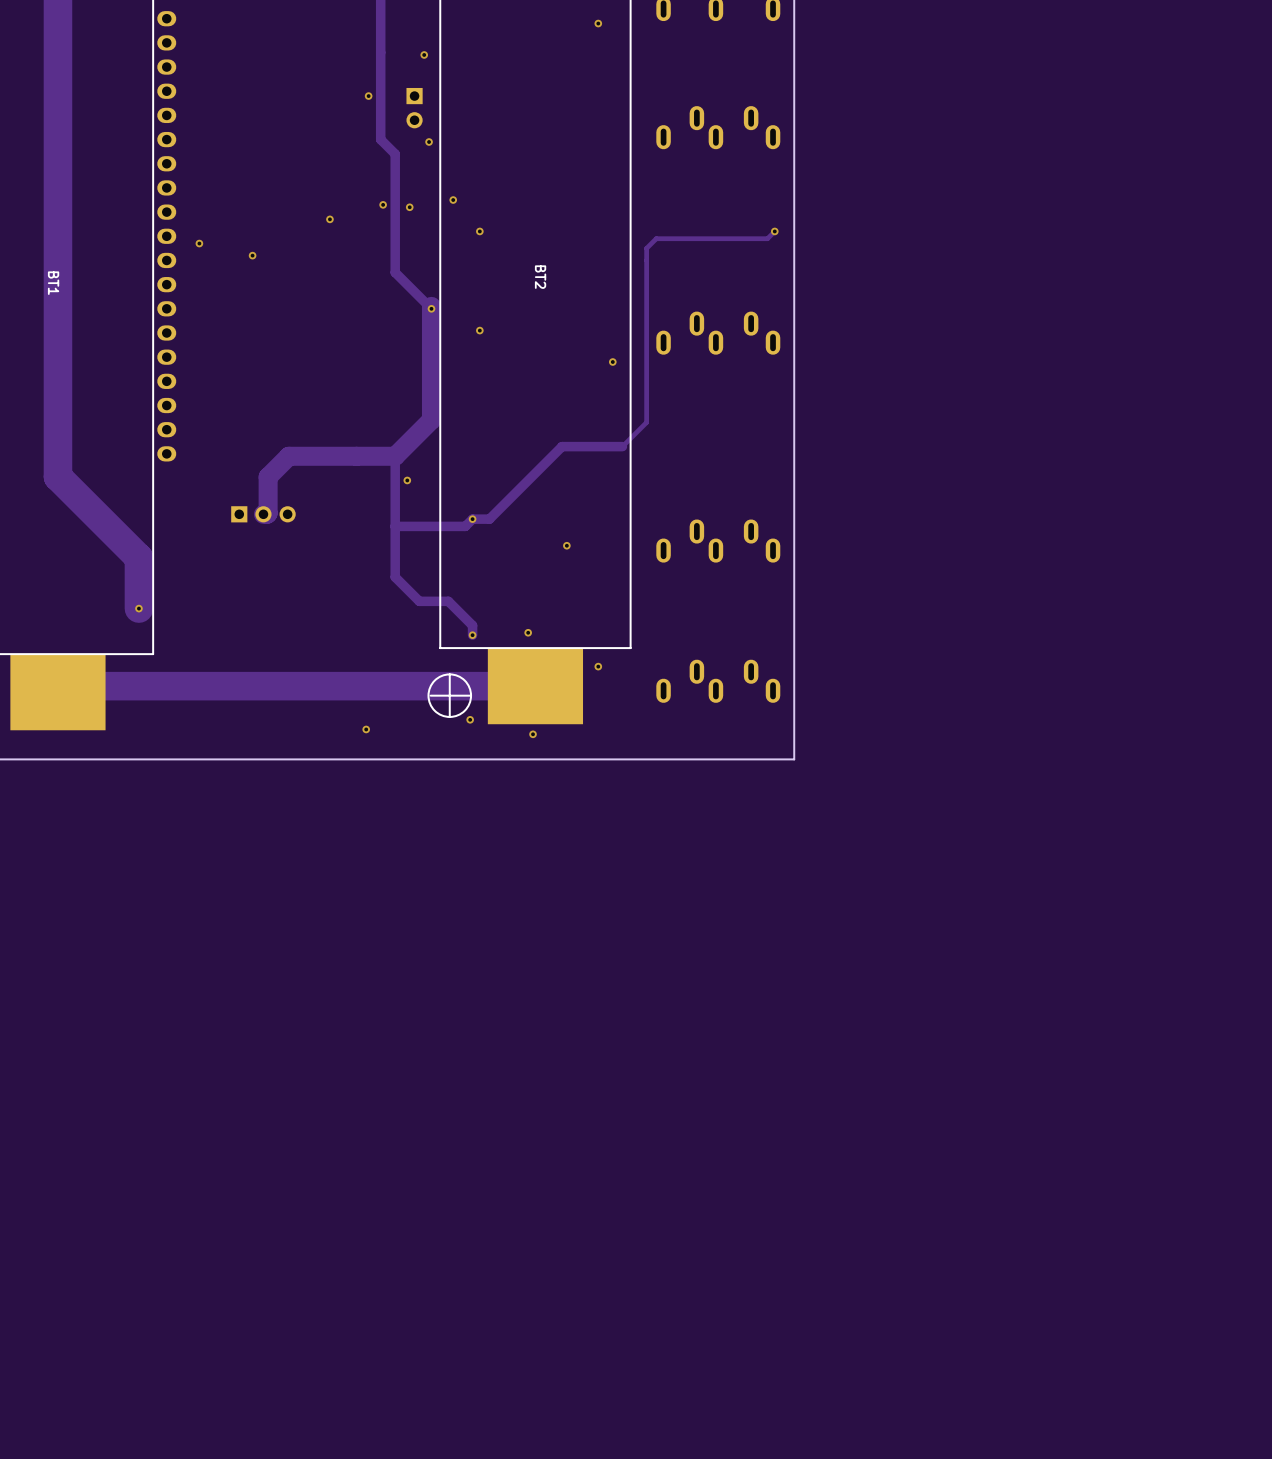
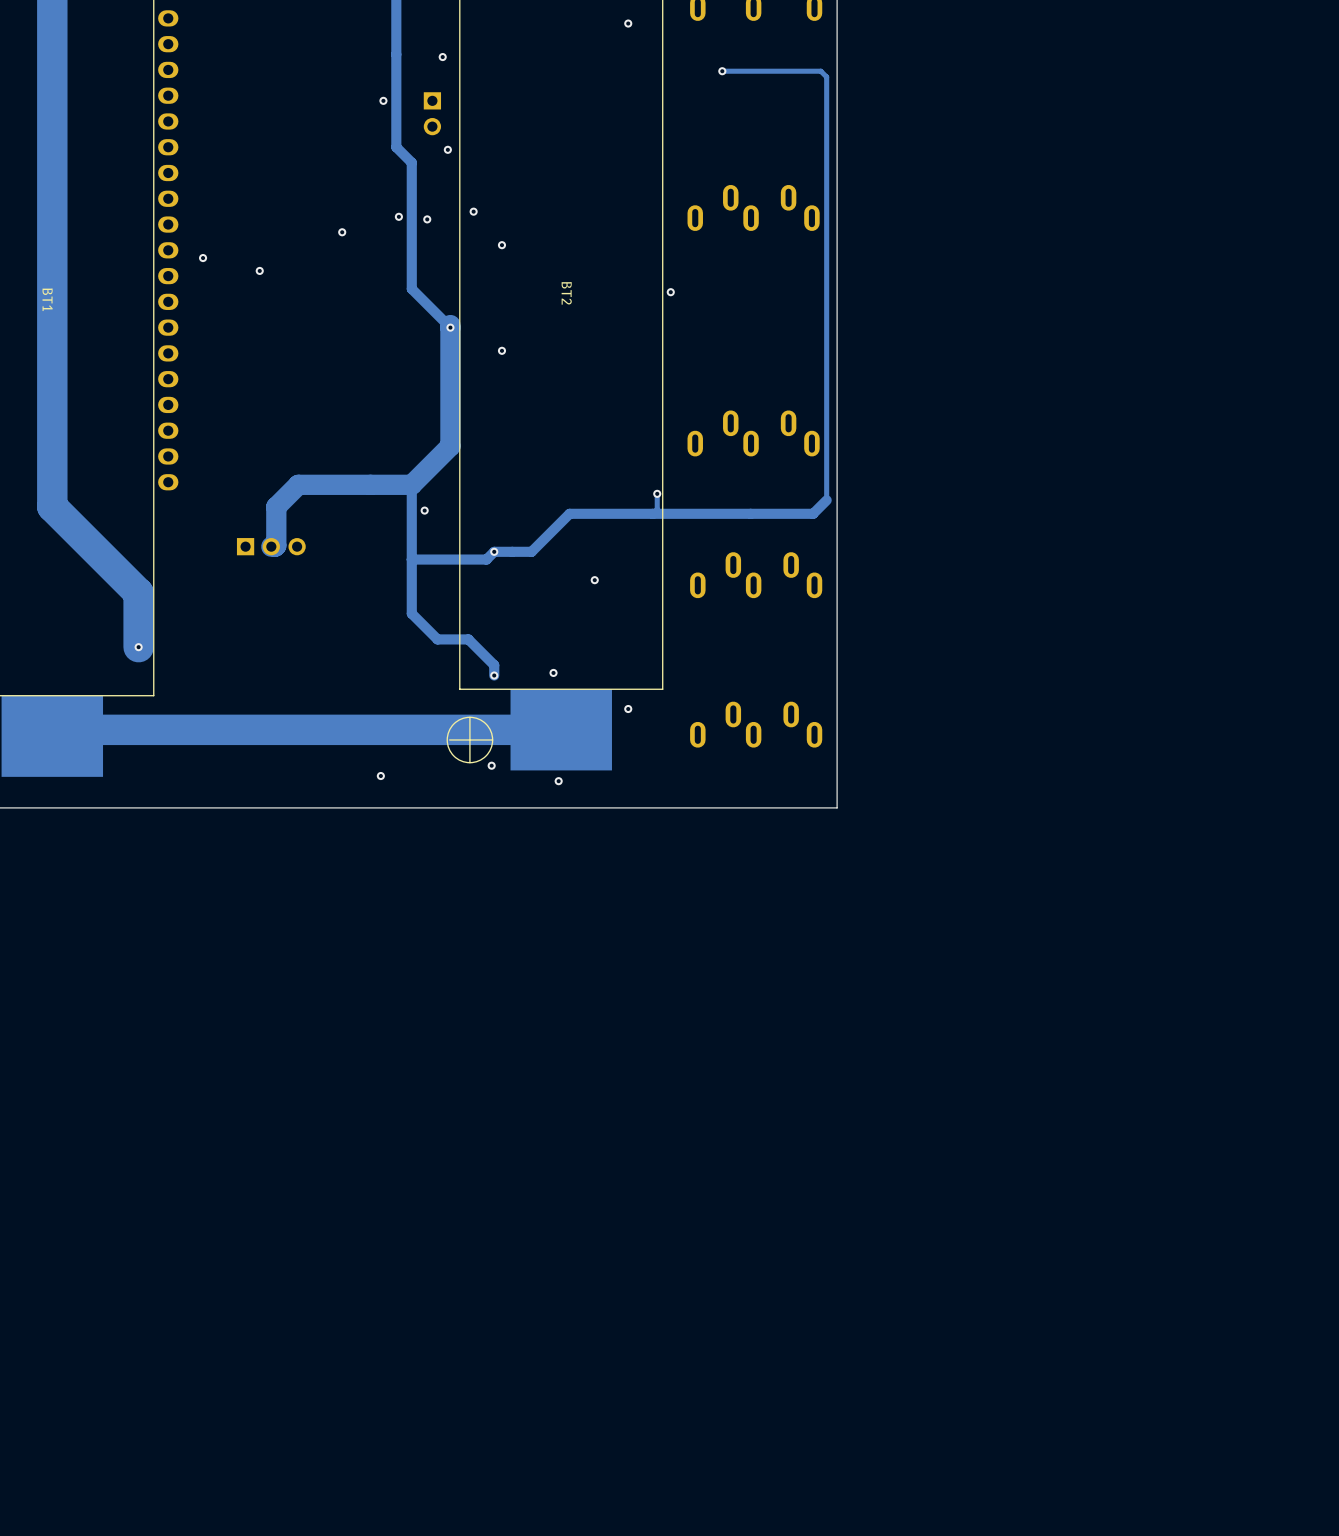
via: none -> (722, 71)
part: (718, 127) -> none
part: none -> (753, 207)
track: (774, 231) (767, 238) (656, 238) (646, 248) (646, 422) (622, 446) (562, 446) (489, 519) -> (722, 71) (820, 71) (826, 77) (826, 500) (813, 513) (569, 513) (531, 551) (512, 551)
via: (774, 231) -> none
via: none -> (670, 292)
part: (718, 333) -> none
via: (612, 362) -> none
part: none -> (753, 433)
track: none -> (657, 493) (657, 509) (652, 513)
via: none -> (657, 493)

